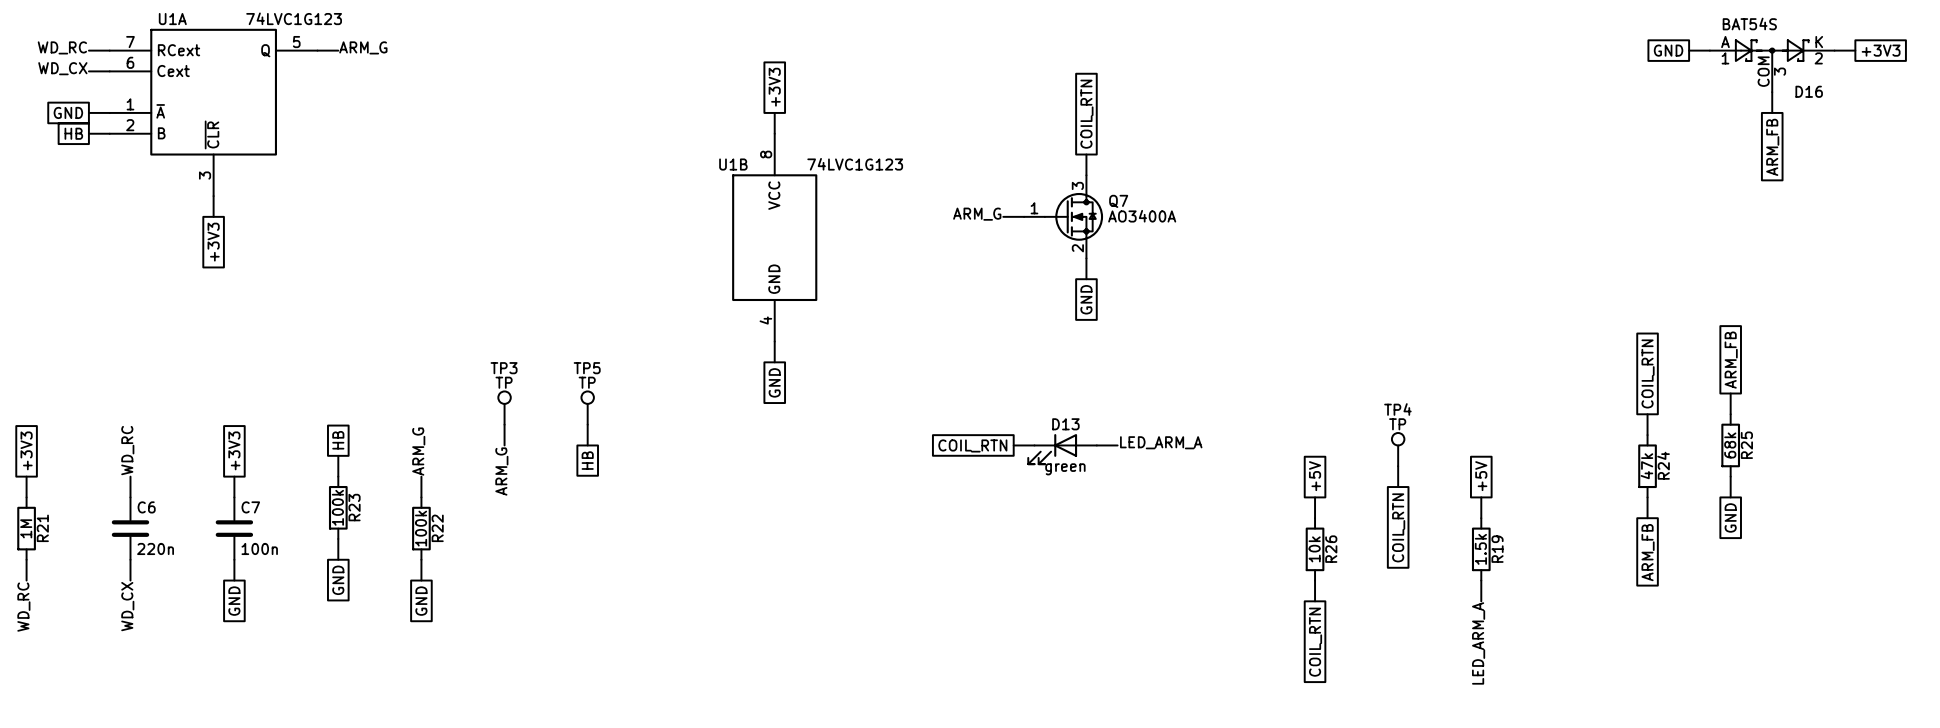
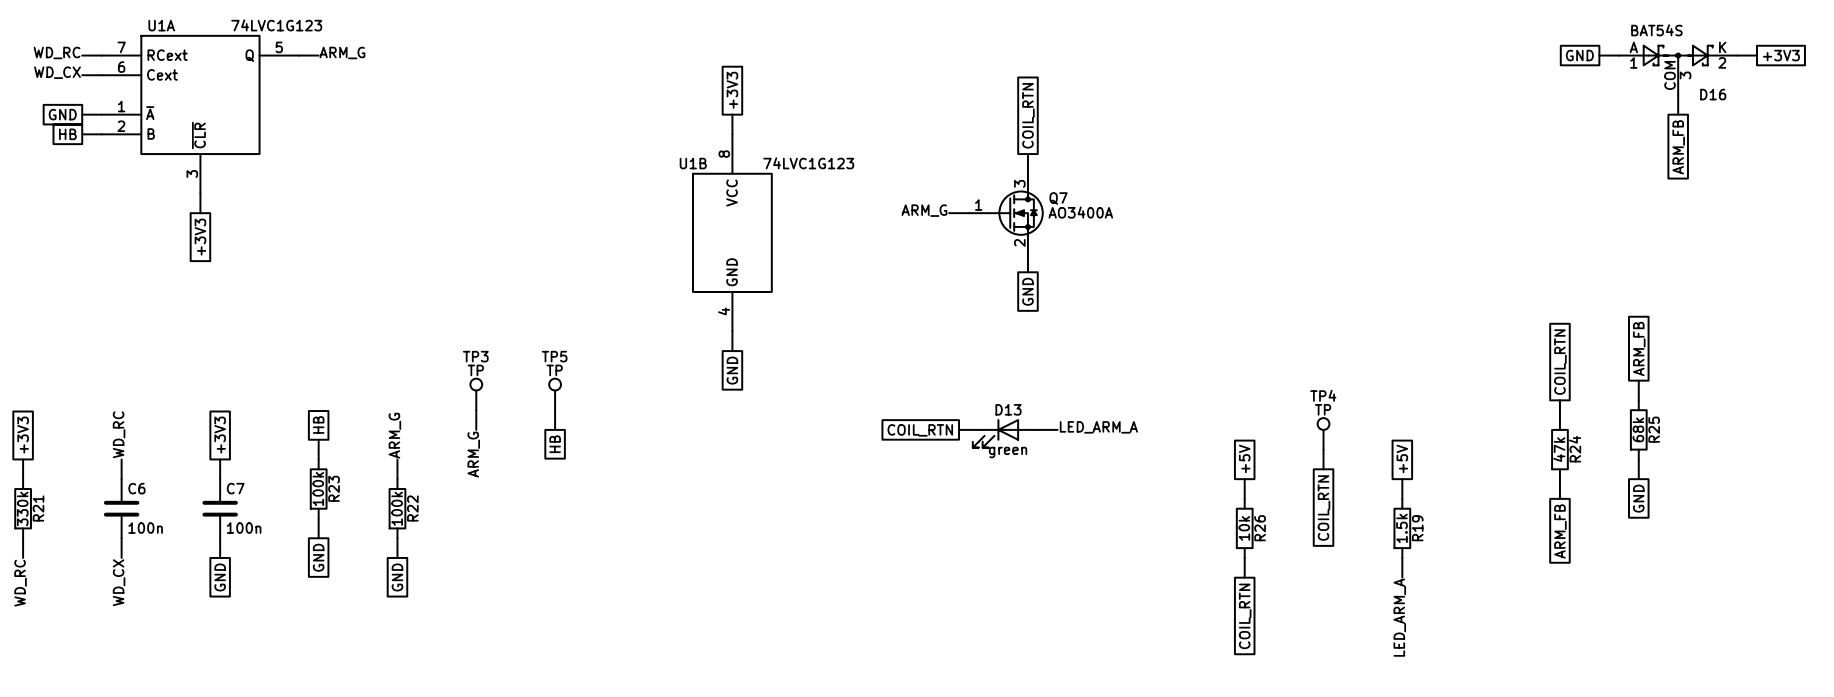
R21 value: 1M (26, 528) -> 330k (22, 508)
C6 value: 220n (155, 548) -> 100n (145, 528)

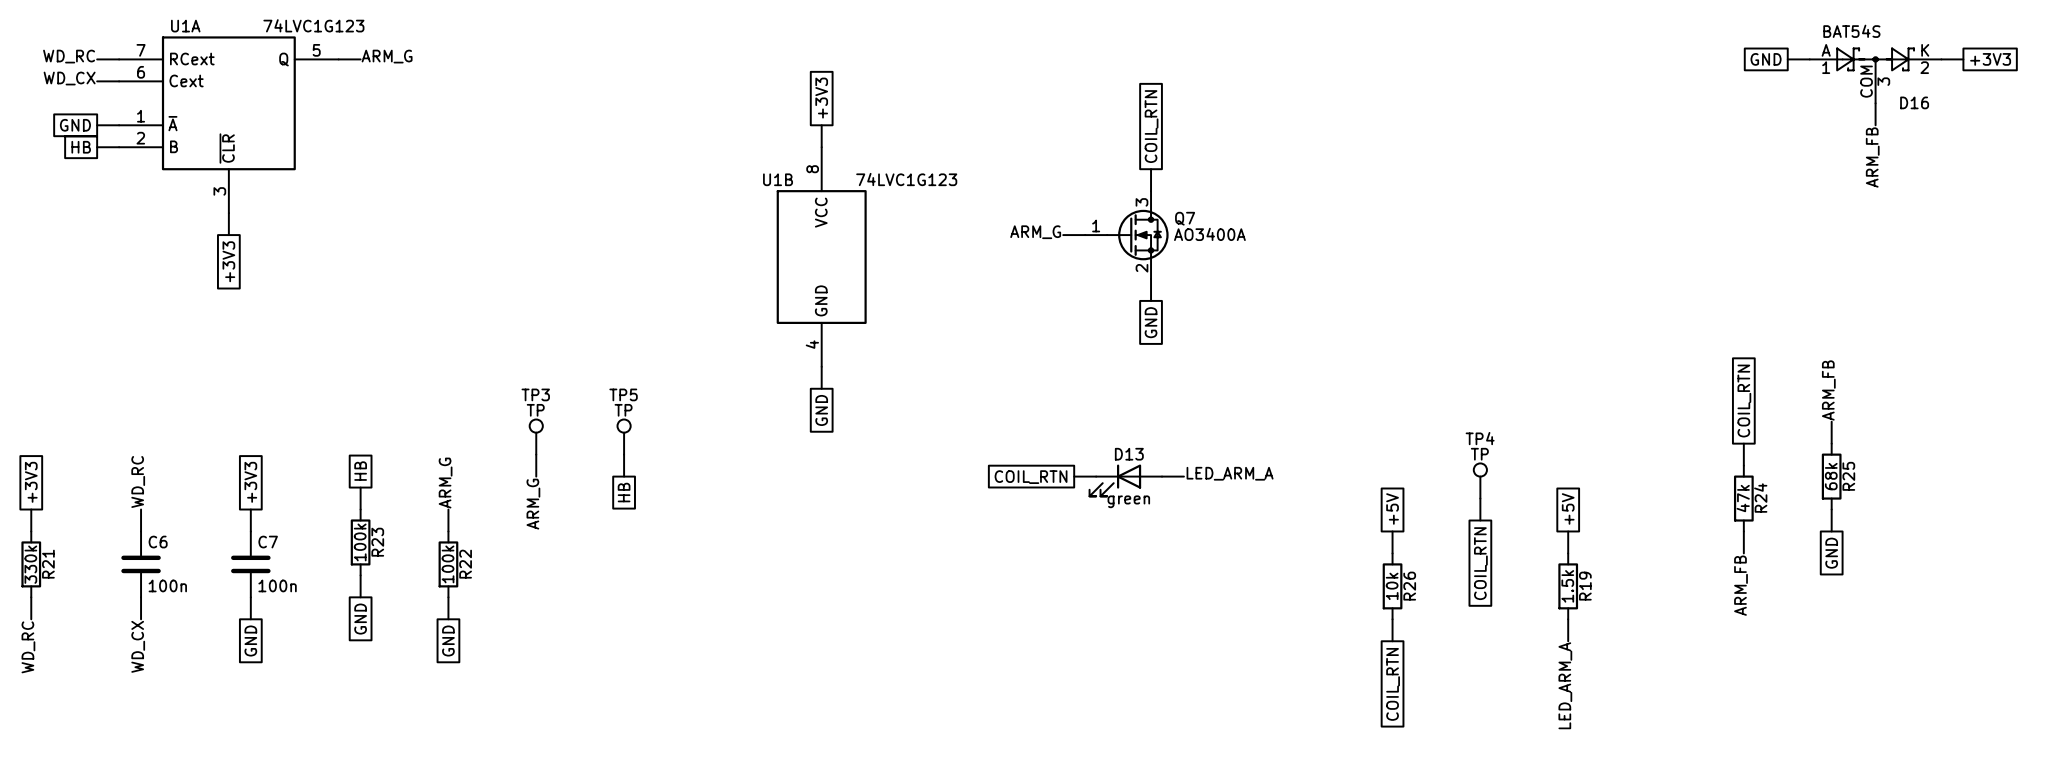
label: none -> ARM_FB (1872, 157)
global label: ARM_FB (1678, 147) -> none
global label: ARM_FB (1639, 348) -> none
label: none -> ARM_FB (1828, 390)
label: none -> ARM_FB (1741, 585)
global label: ARM_FB (1560, 531) -> none

